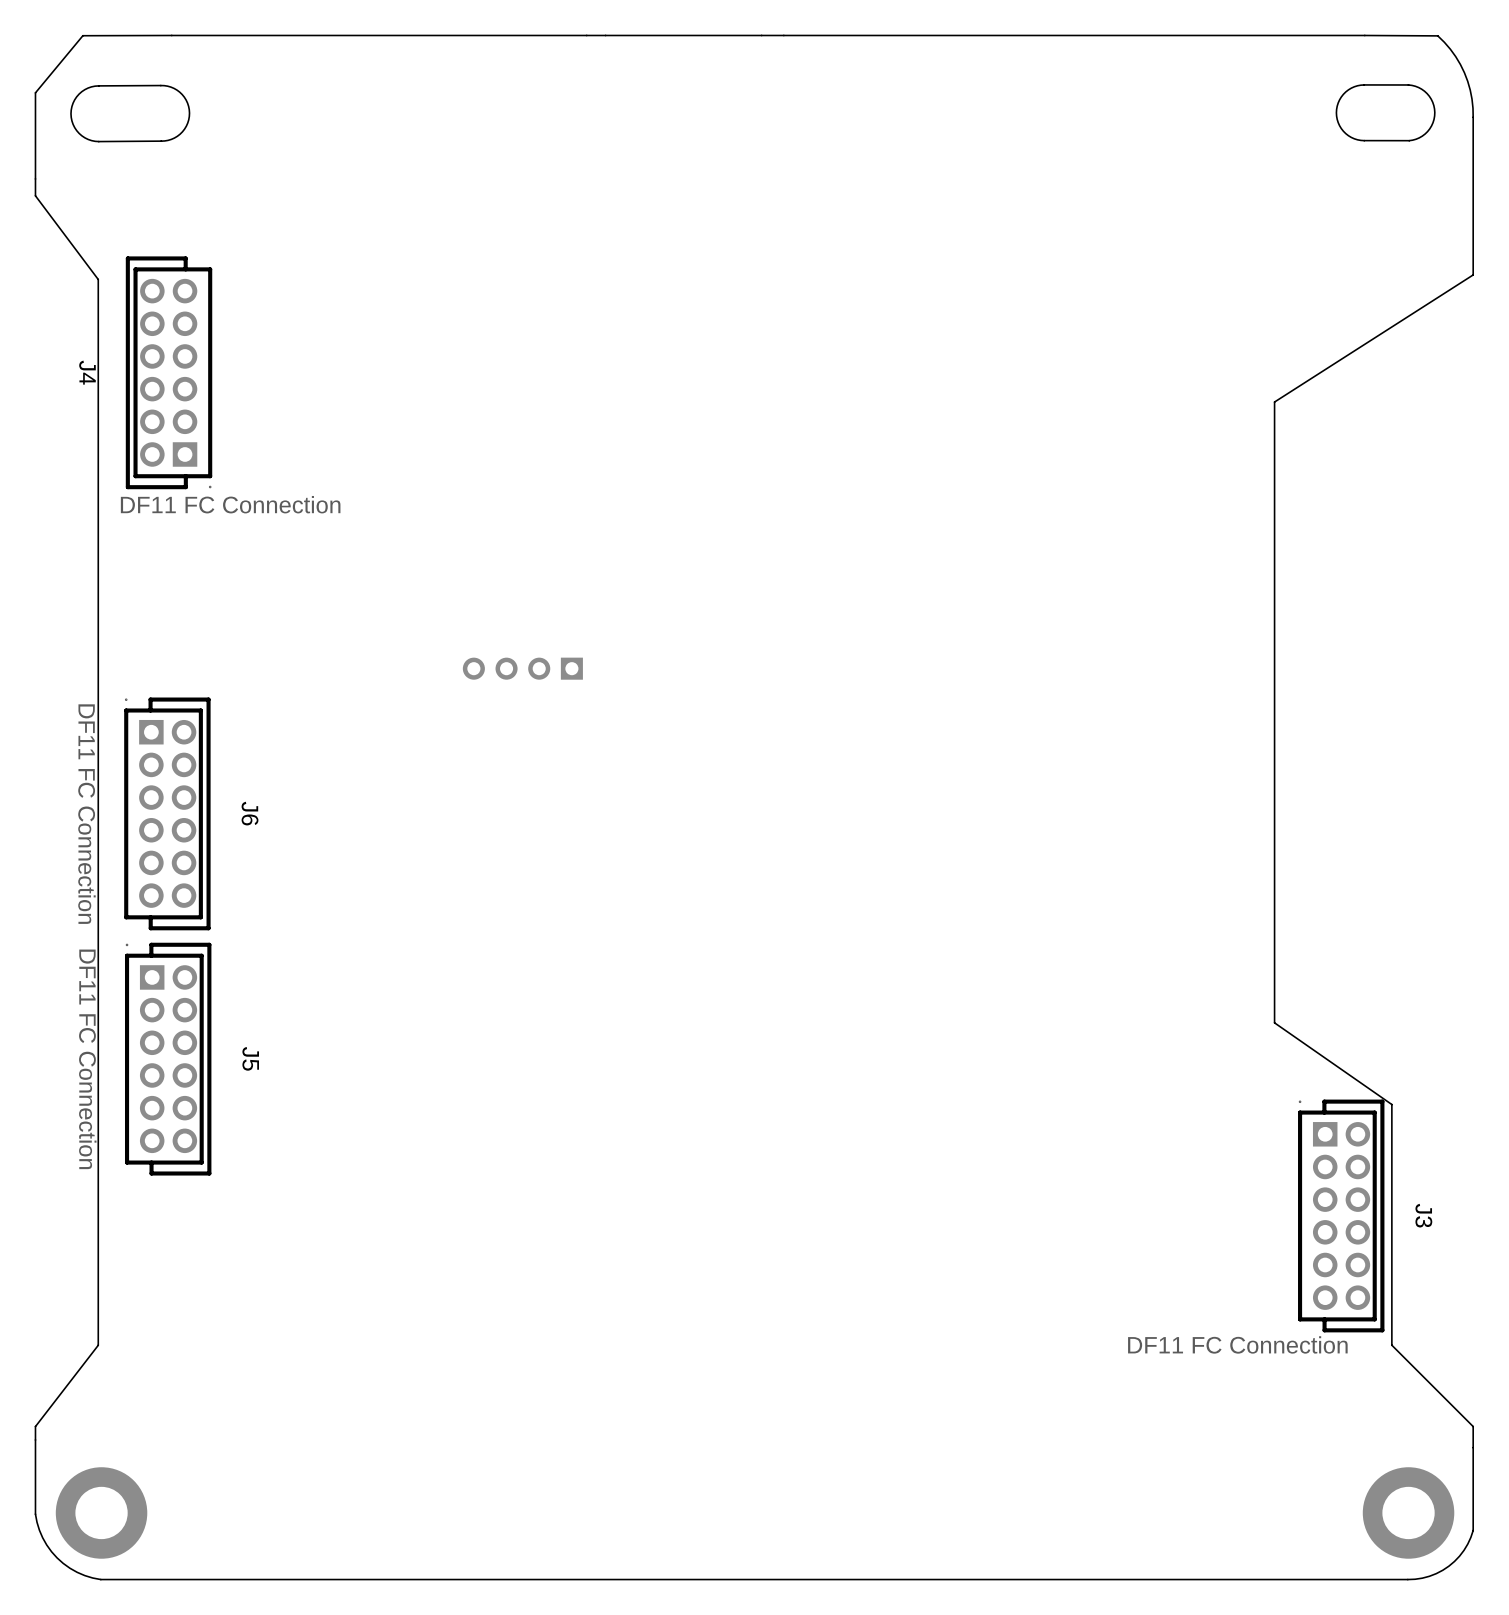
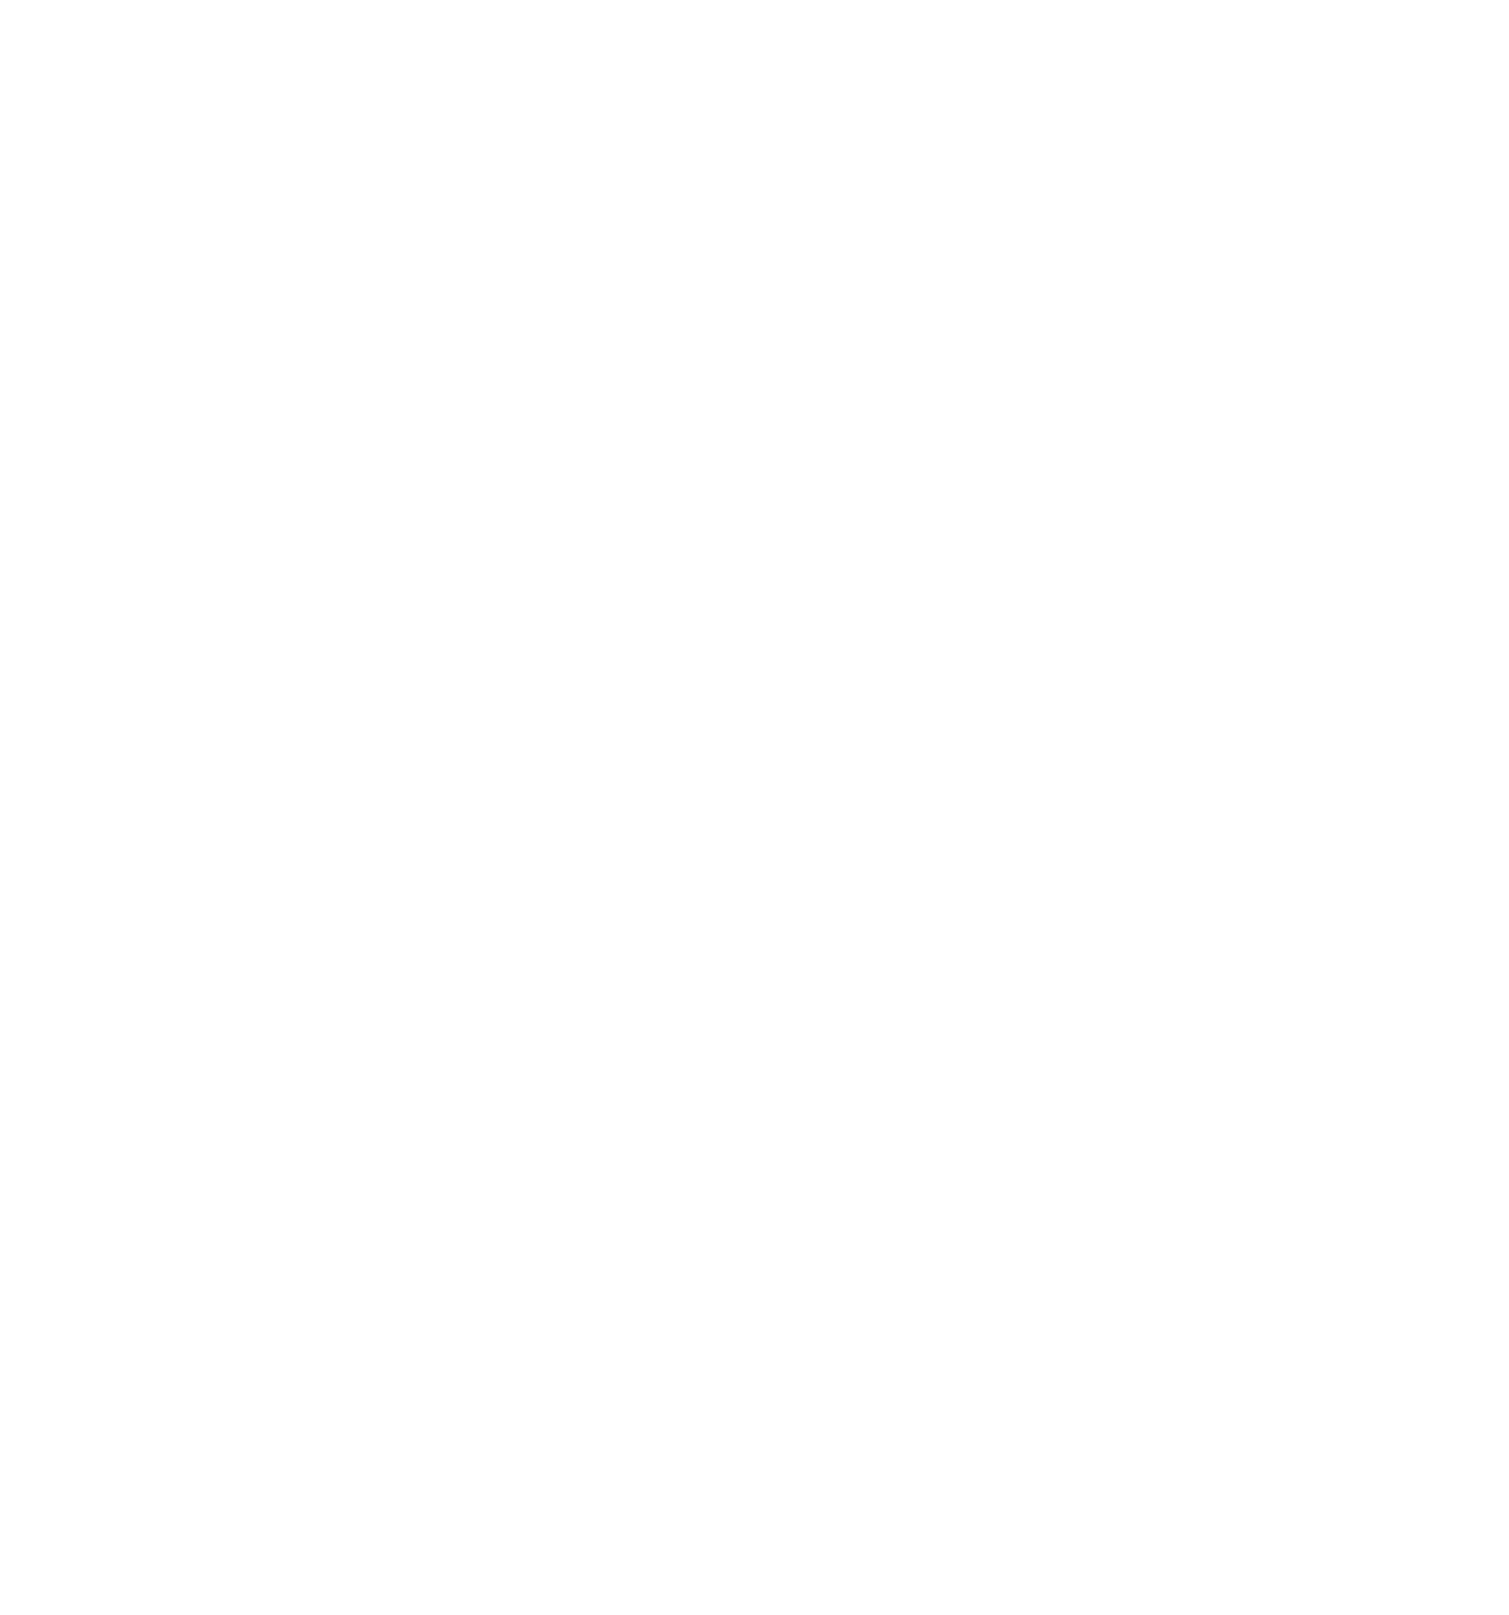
board edge: (1364, 35) (82, 35) (35, 92) (35, 195) (98, 279) (98, 1345) (35, 1426) (37, 1522) (46, 1545) (63, 1563) (84, 1575) (100, 1579) (1407, 1579) (1422, 1578) (1436, 1573) (1448, 1566) (1459, 1556) (1467, 1544) (1473, 1530) (1473, 1426) (1391, 1345) (1391, 1104) (1274, 1022) (1274, 402) (1473, 274) (1472, 108) (1470, 90) (1464, 72) (1455, 56) (1437, 35) (1364, 35) -> none
board edge: (1408, 84) (1360, 85) (1348, 89) (1341, 96) (1336, 109) (1337, 119) (1341, 128) (1351, 137) (1360, 140) (1409, 140) (1422, 136) (1433, 122) (1433, 105) (1424, 91) (1408, 84) -> none
board edge: (160, 85) (98, 85) (88, 88) (79, 94) (73, 103) (70, 113) (73, 124) (81, 135) (95, 141) (161, 141) (174, 138) (182, 131) (187, 123) (188, 106) (184, 97) (176, 90) (160, 85) -> none
J4: DF11 FC Connection (169, 372) -> none
part: (522, 668) -> none
J6: DF11 FC Connection (167, 813) -> none
J5: DF11 FC Connection (168, 1059) -> none
J3: DF11 FC Connection (1341, 1215) -> none
part: (101, 1512) -> none
part: (1408, 1512) -> none

